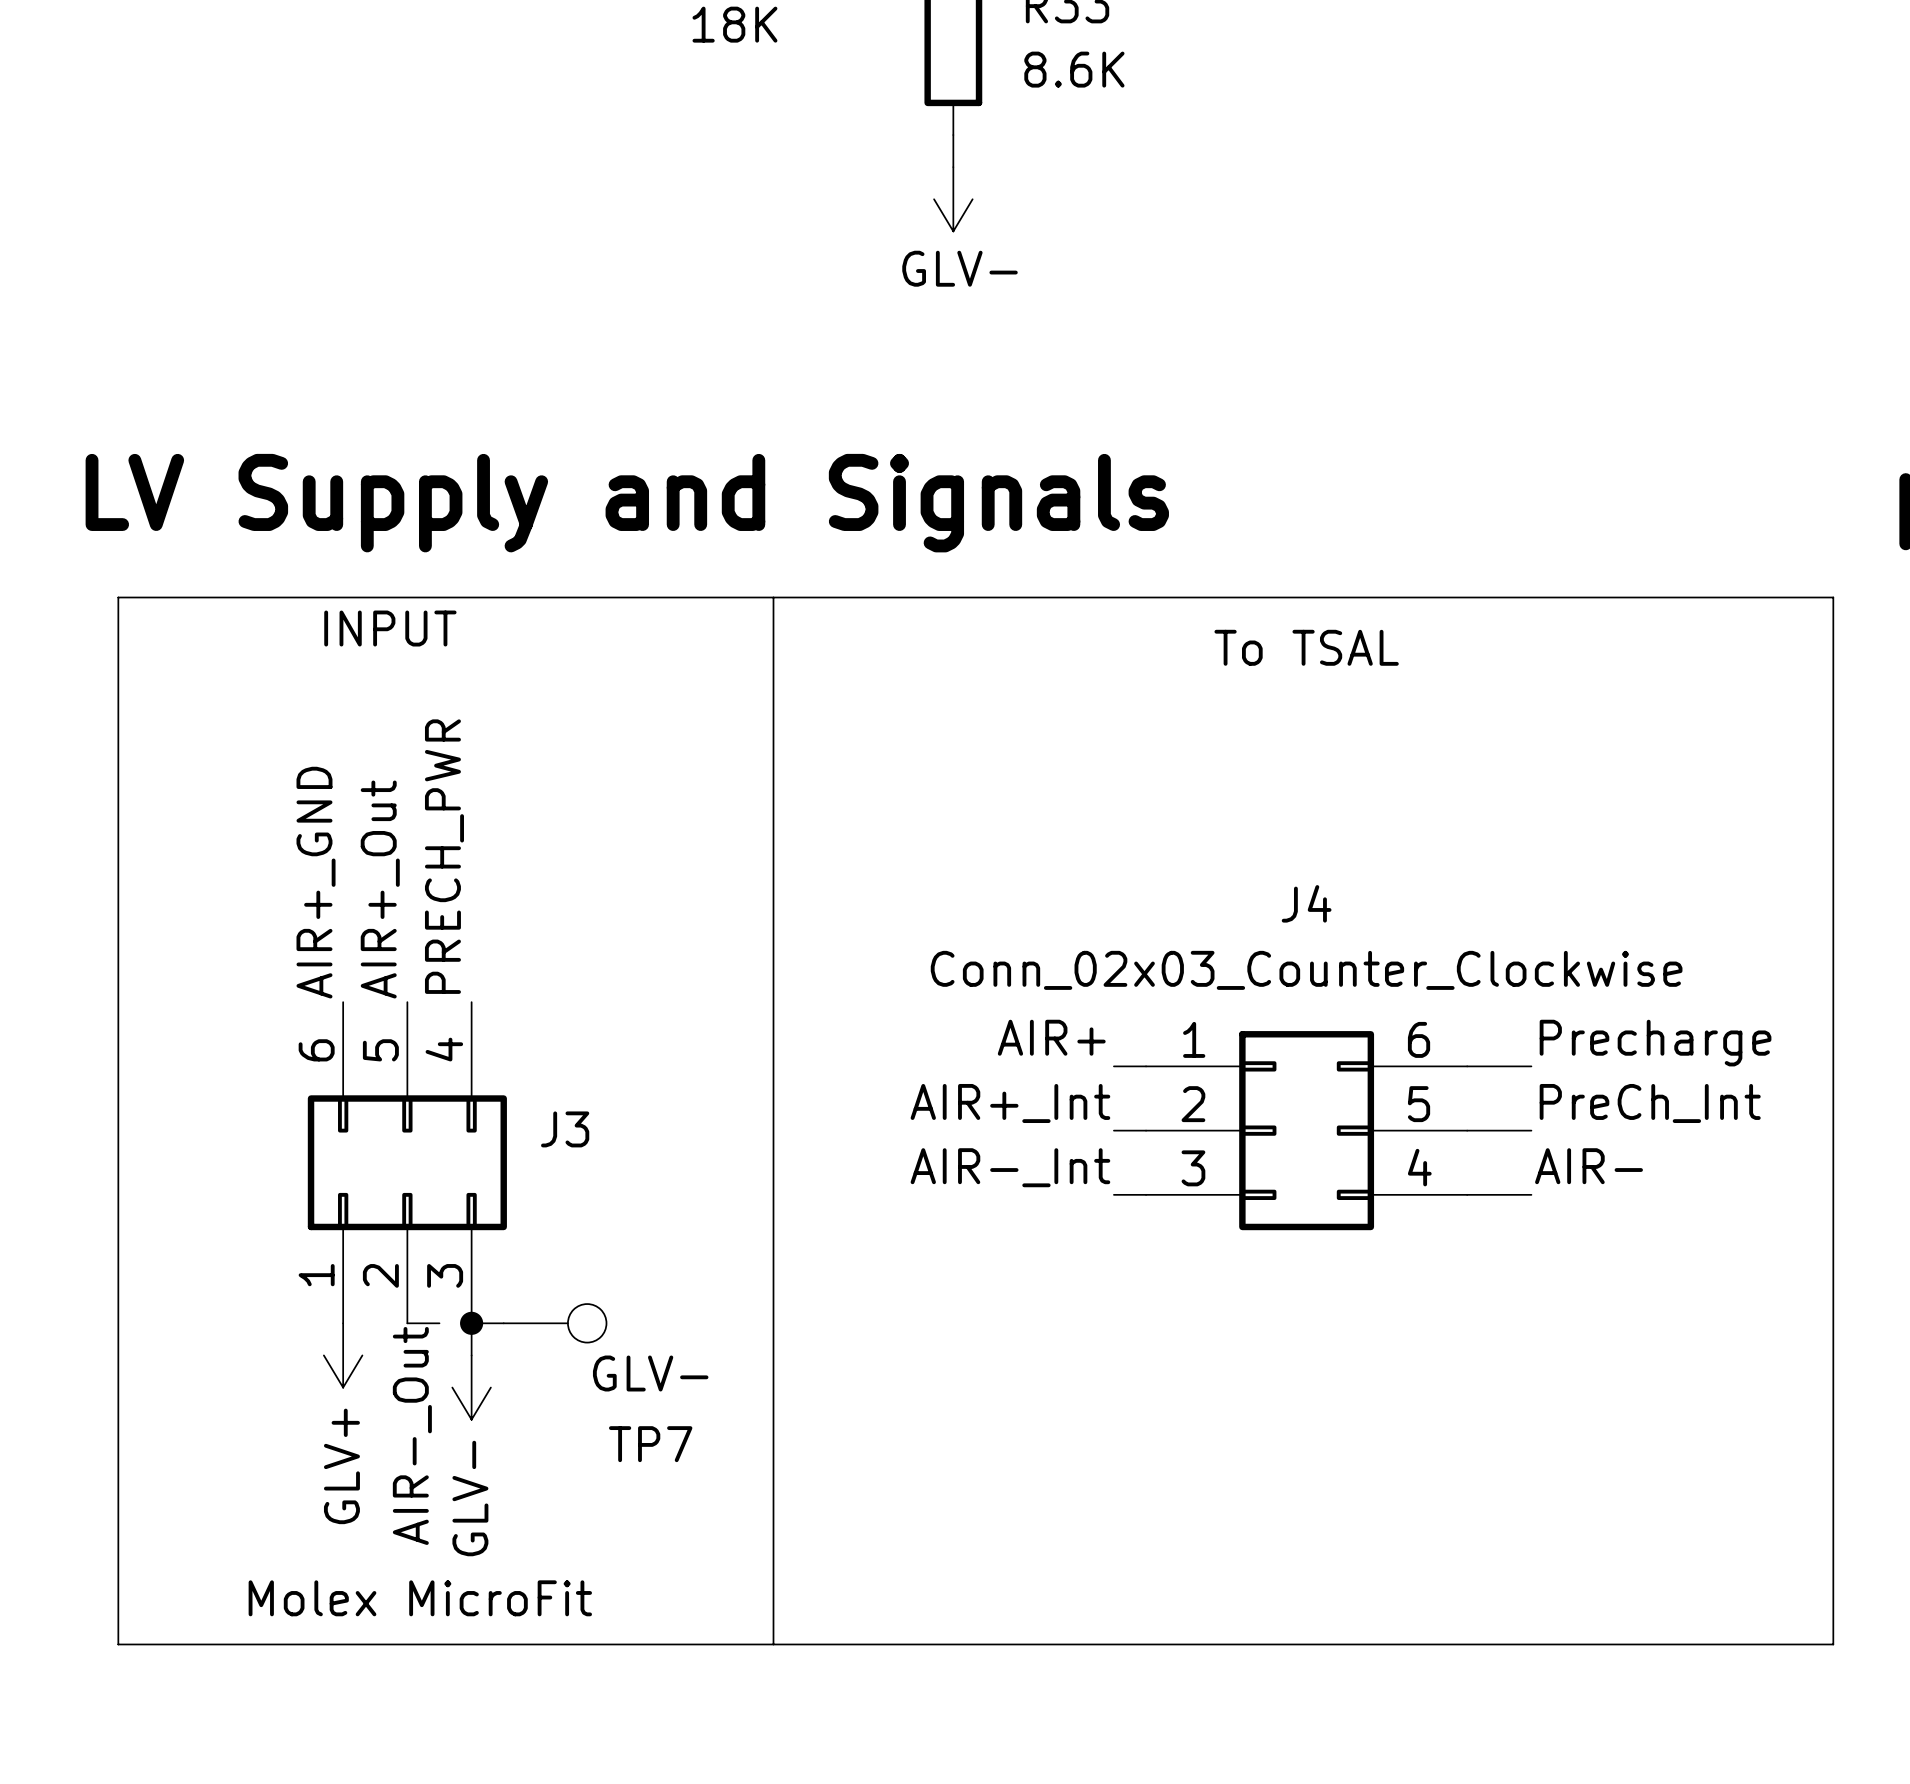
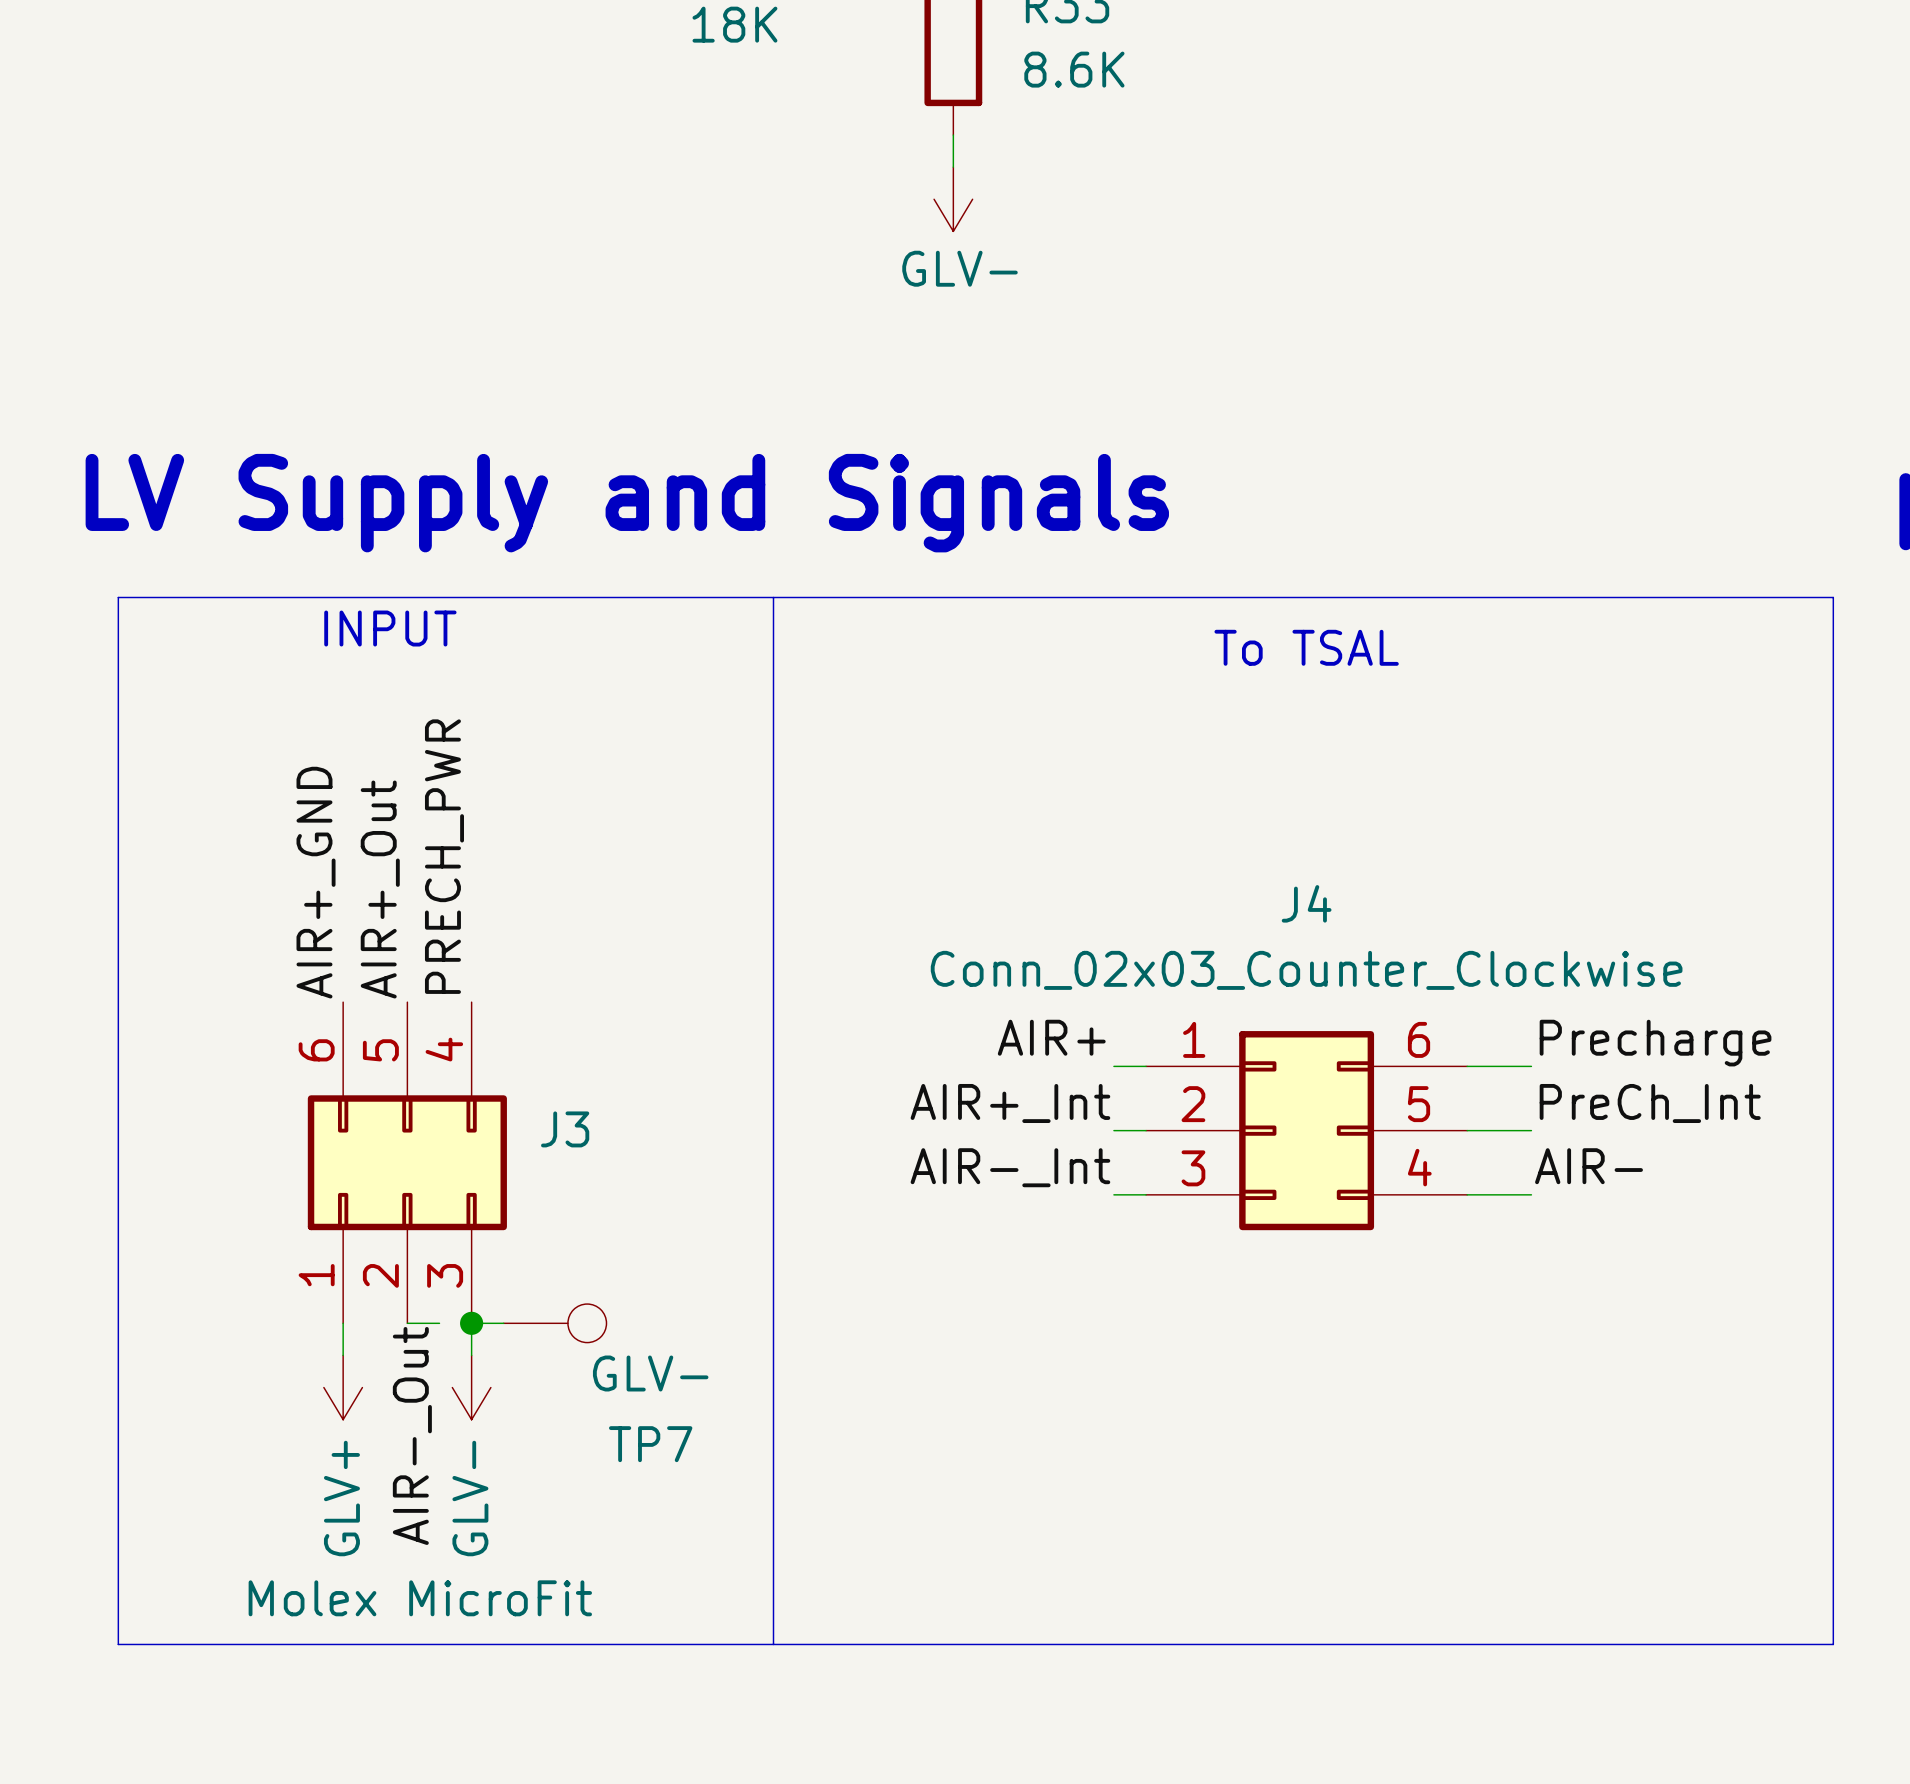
power symbol position: GLV+ (343, 1355) -> GLV+ (343, 1387)

